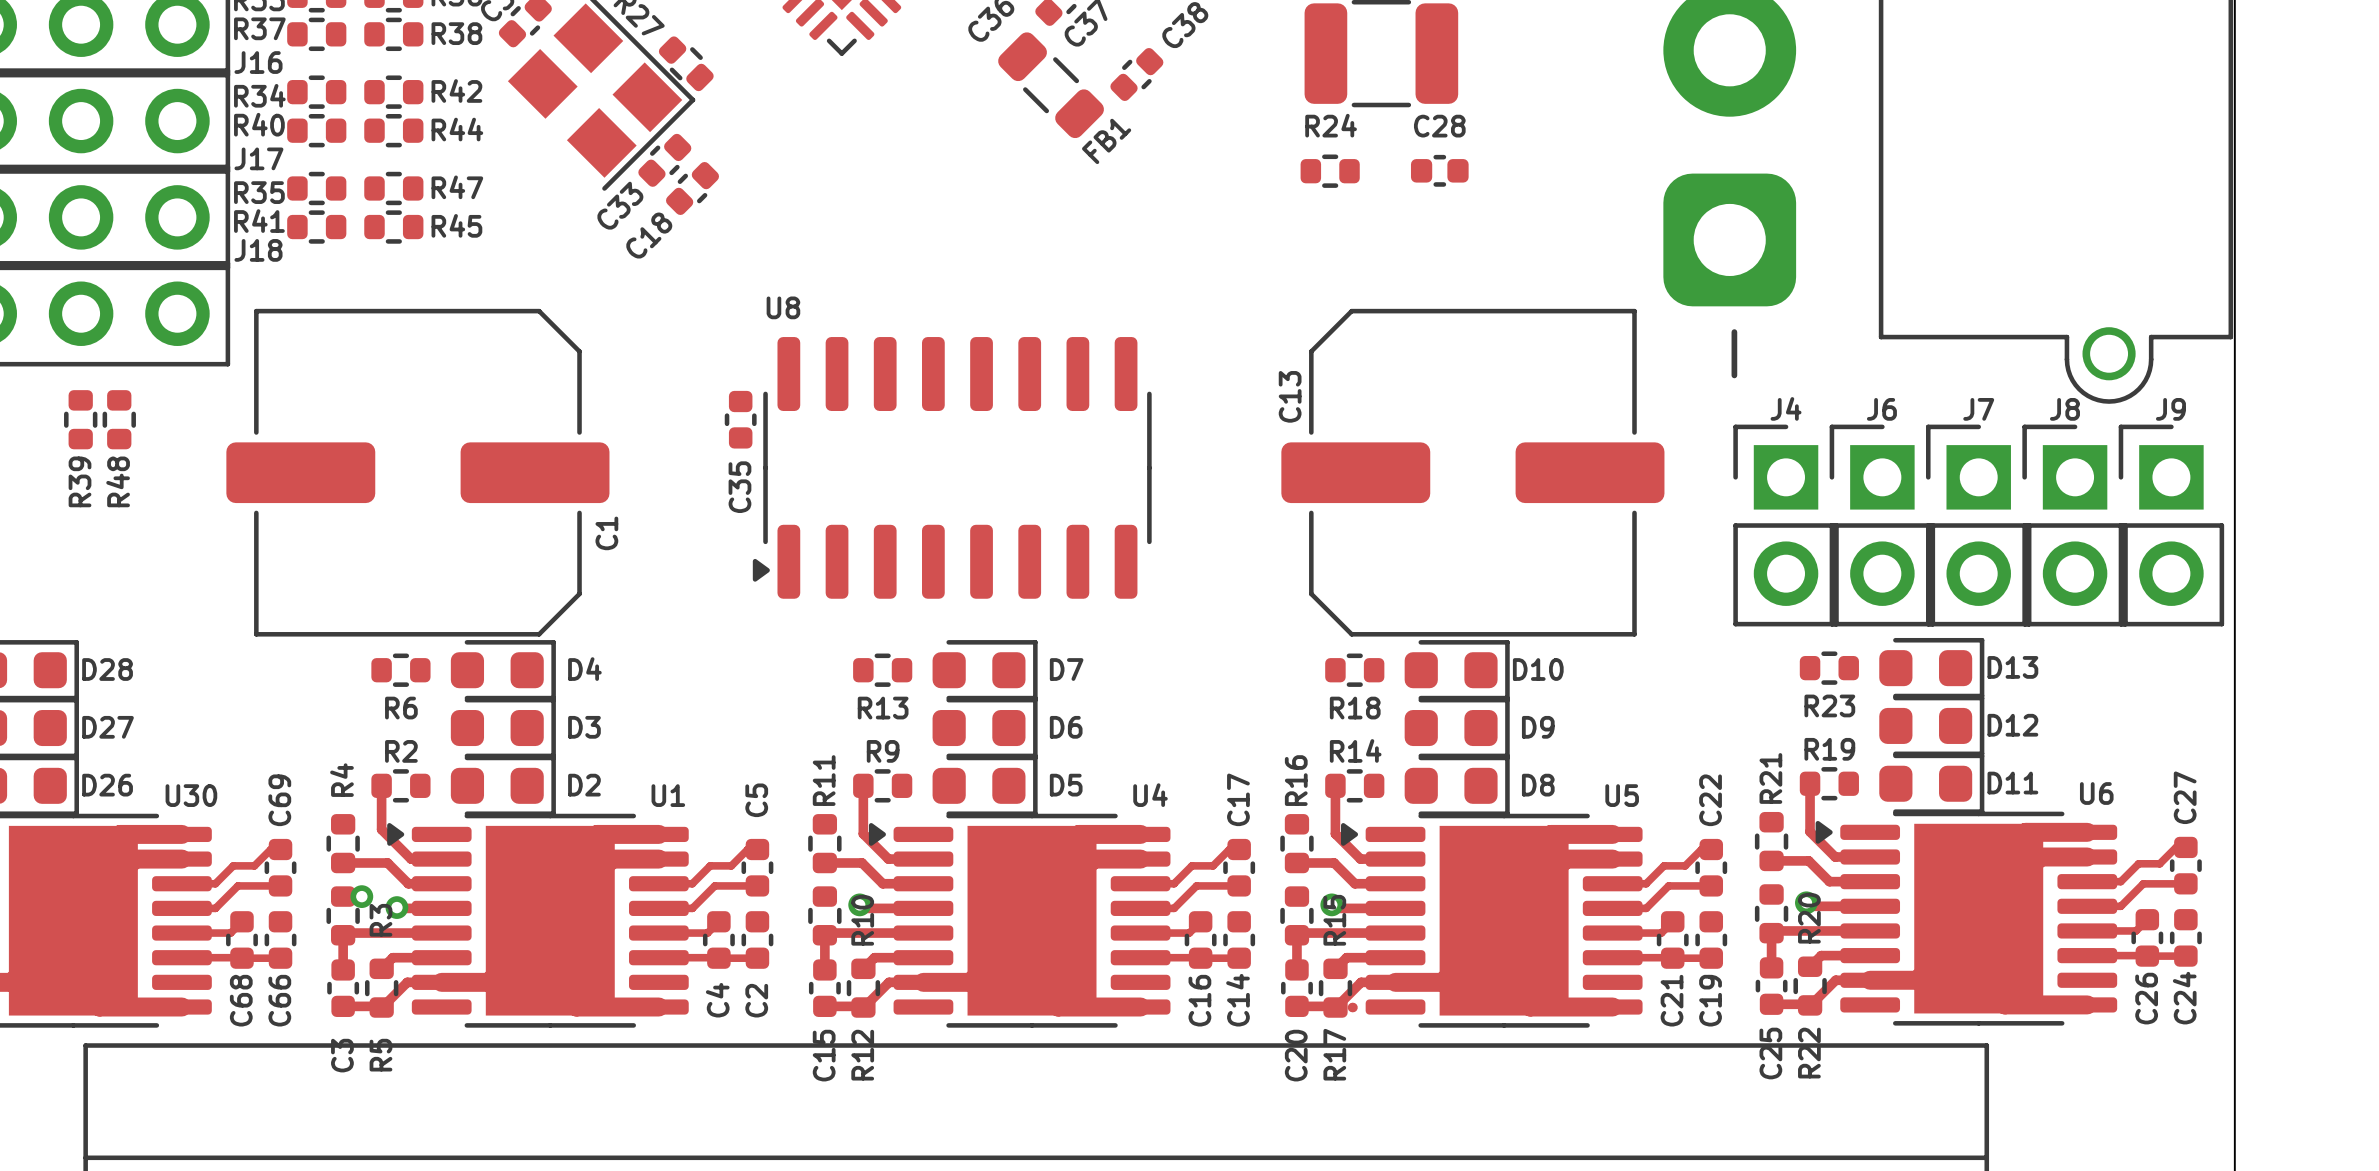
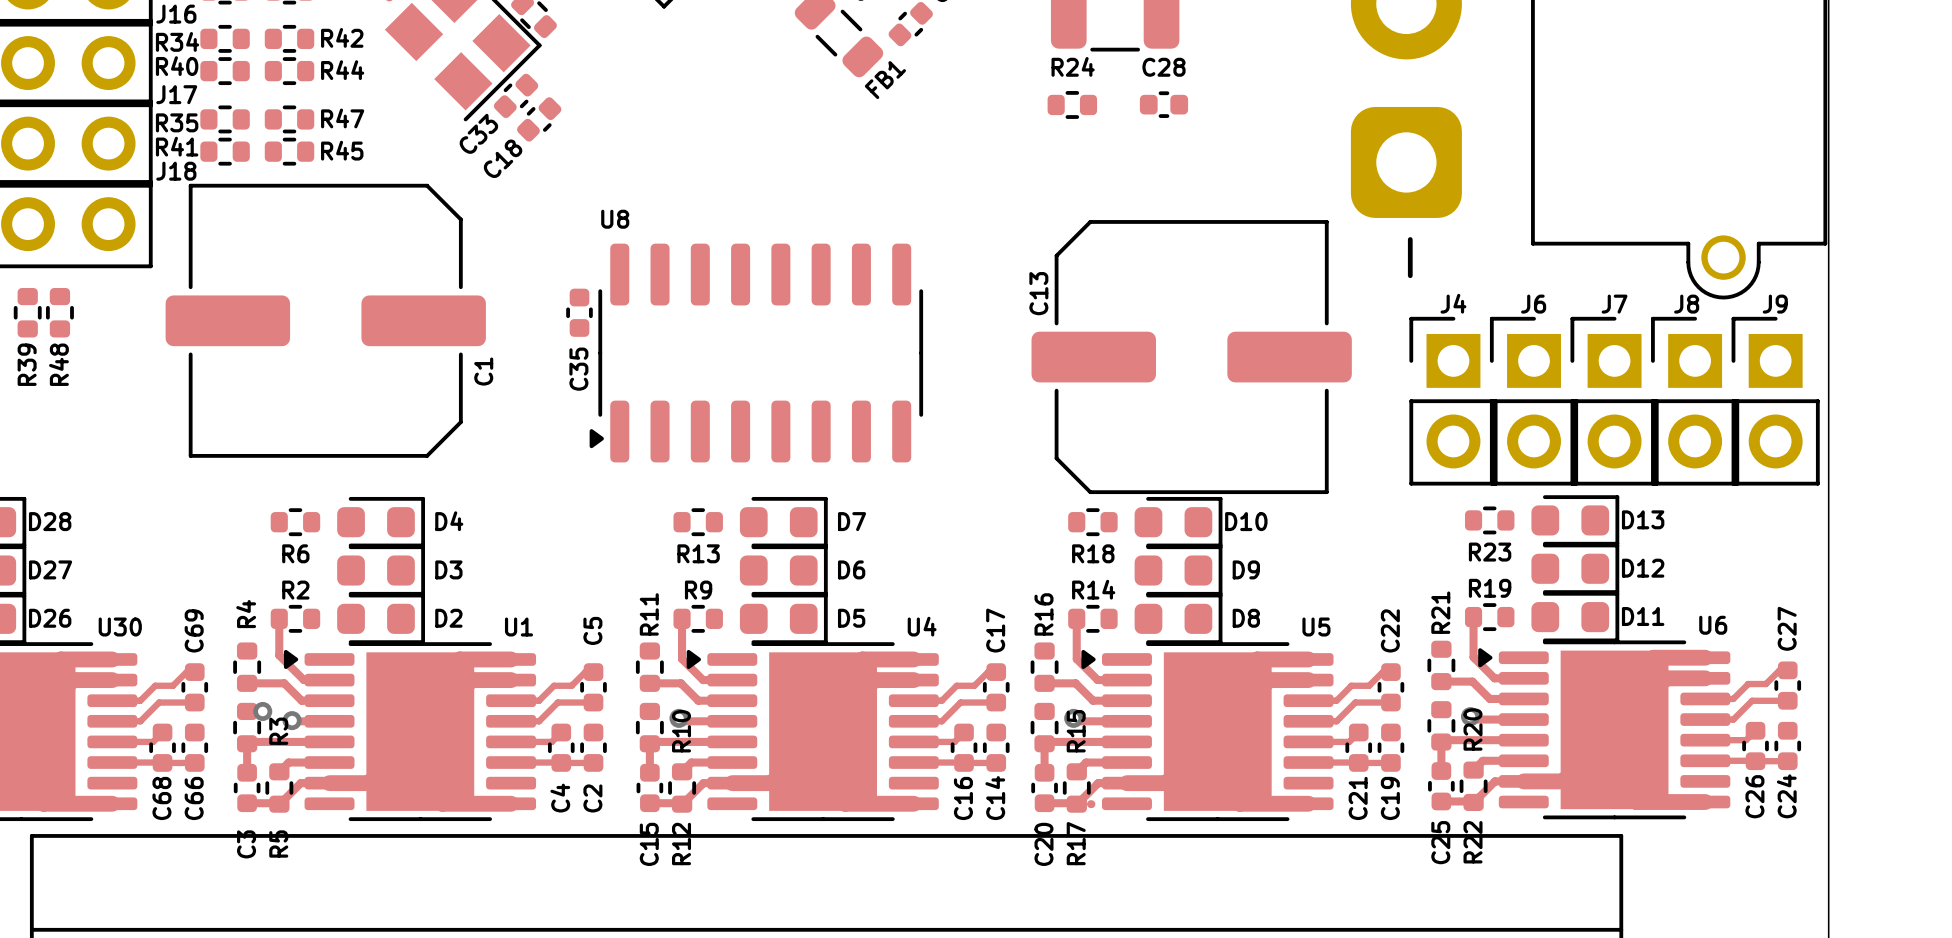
C1 position: (417, 472) -> (325, 320)

